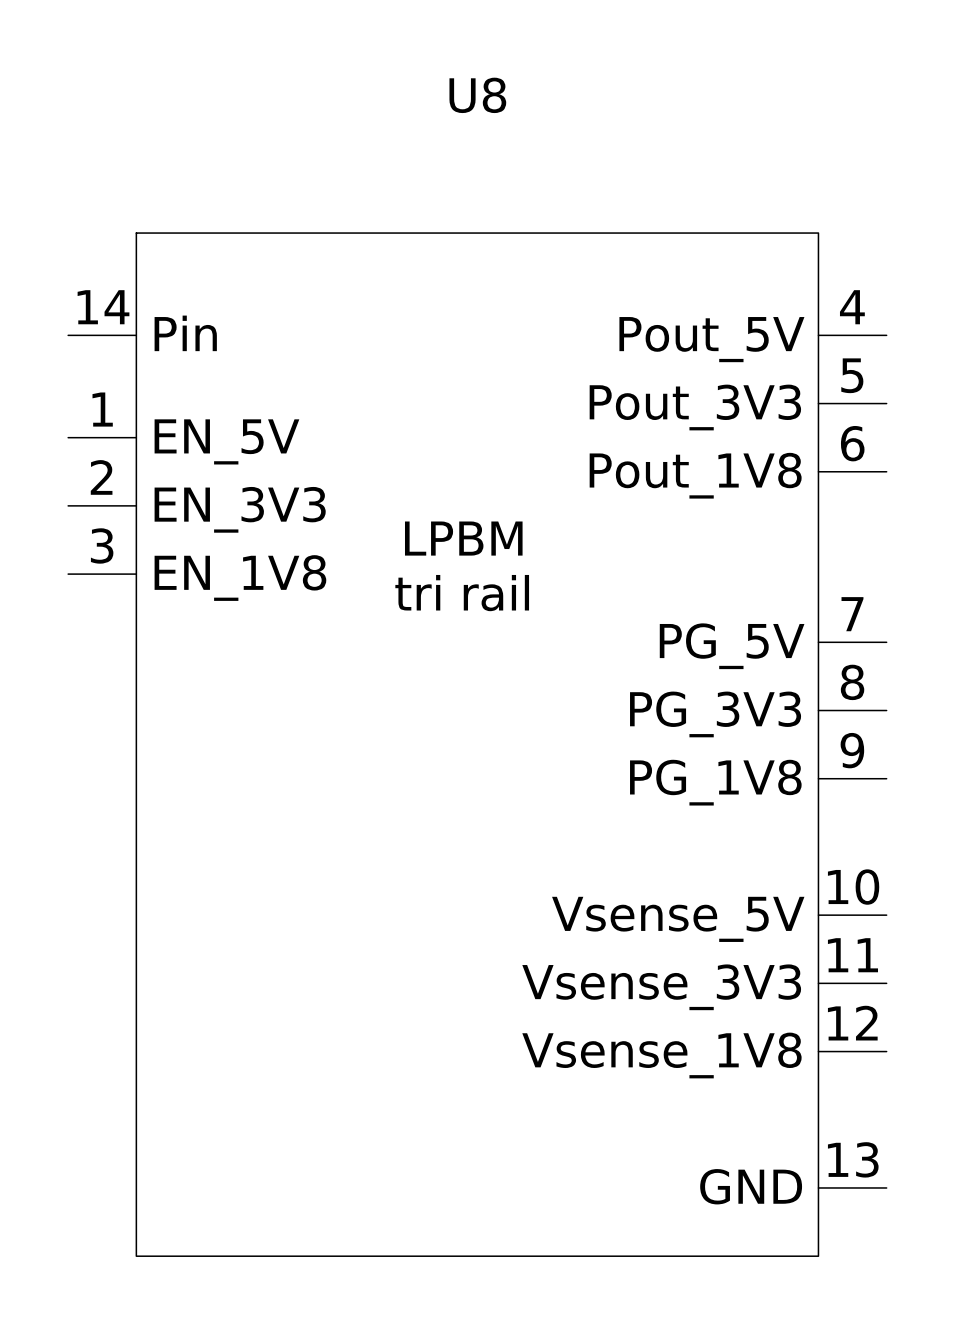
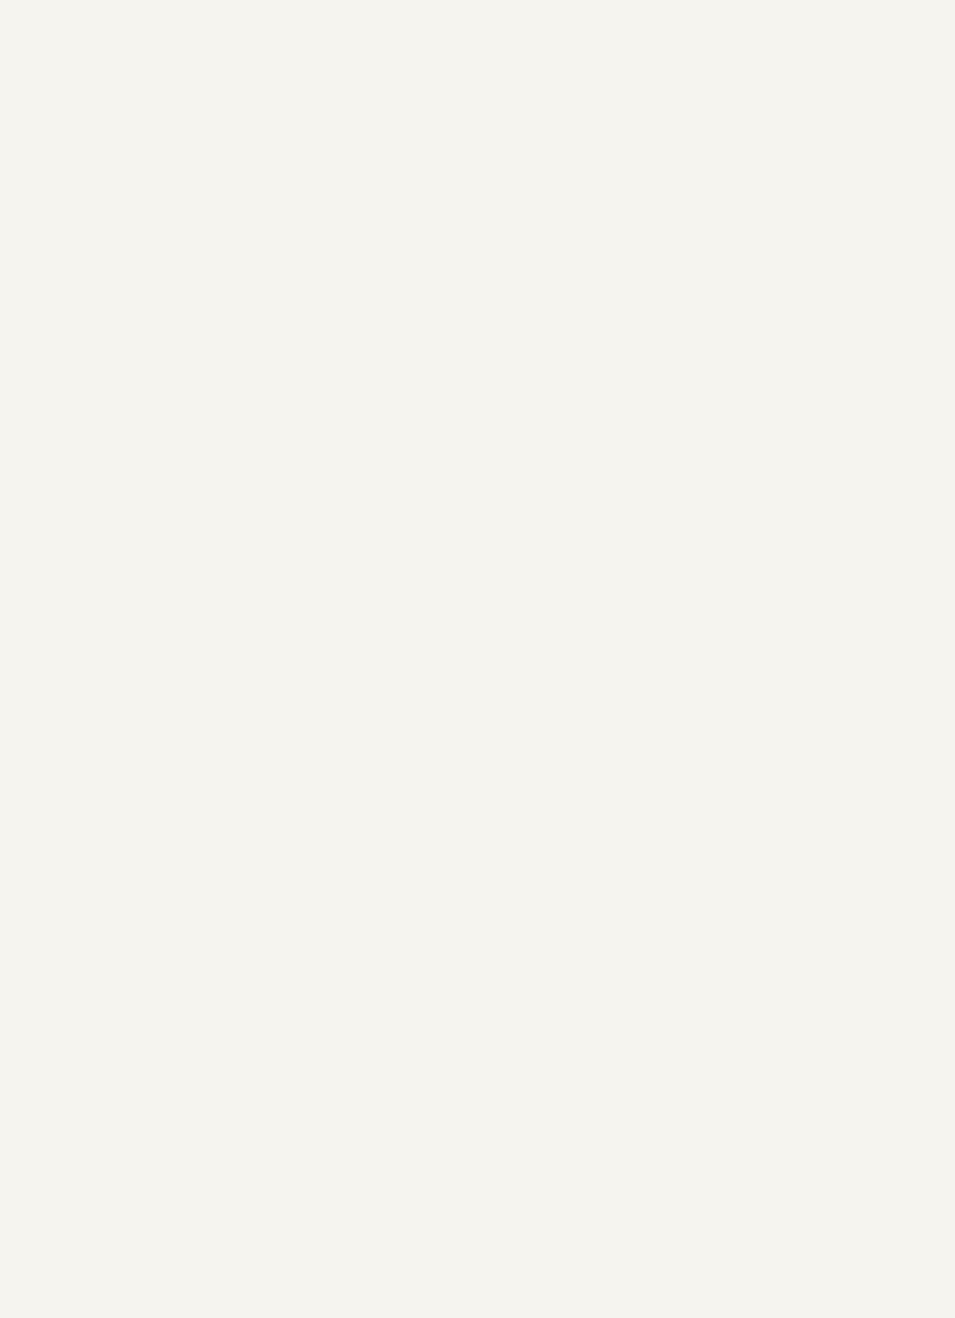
U8: (477, 744) -> none

